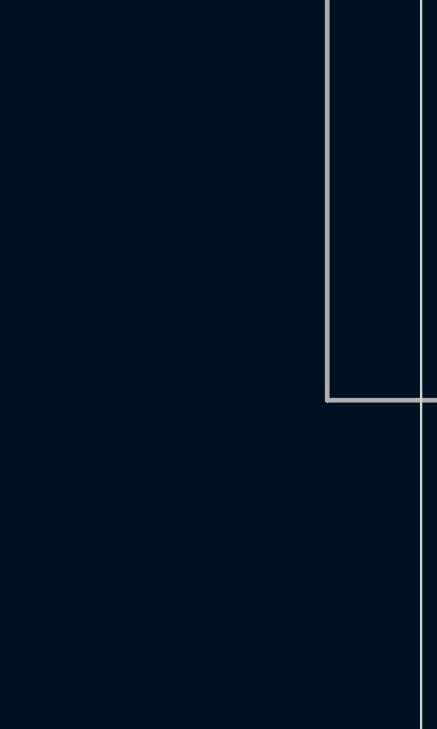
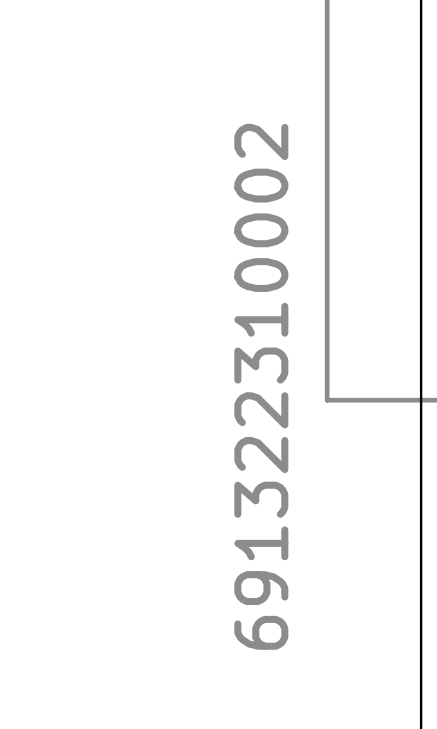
part value: none -> 691322310002 (261, 386)

